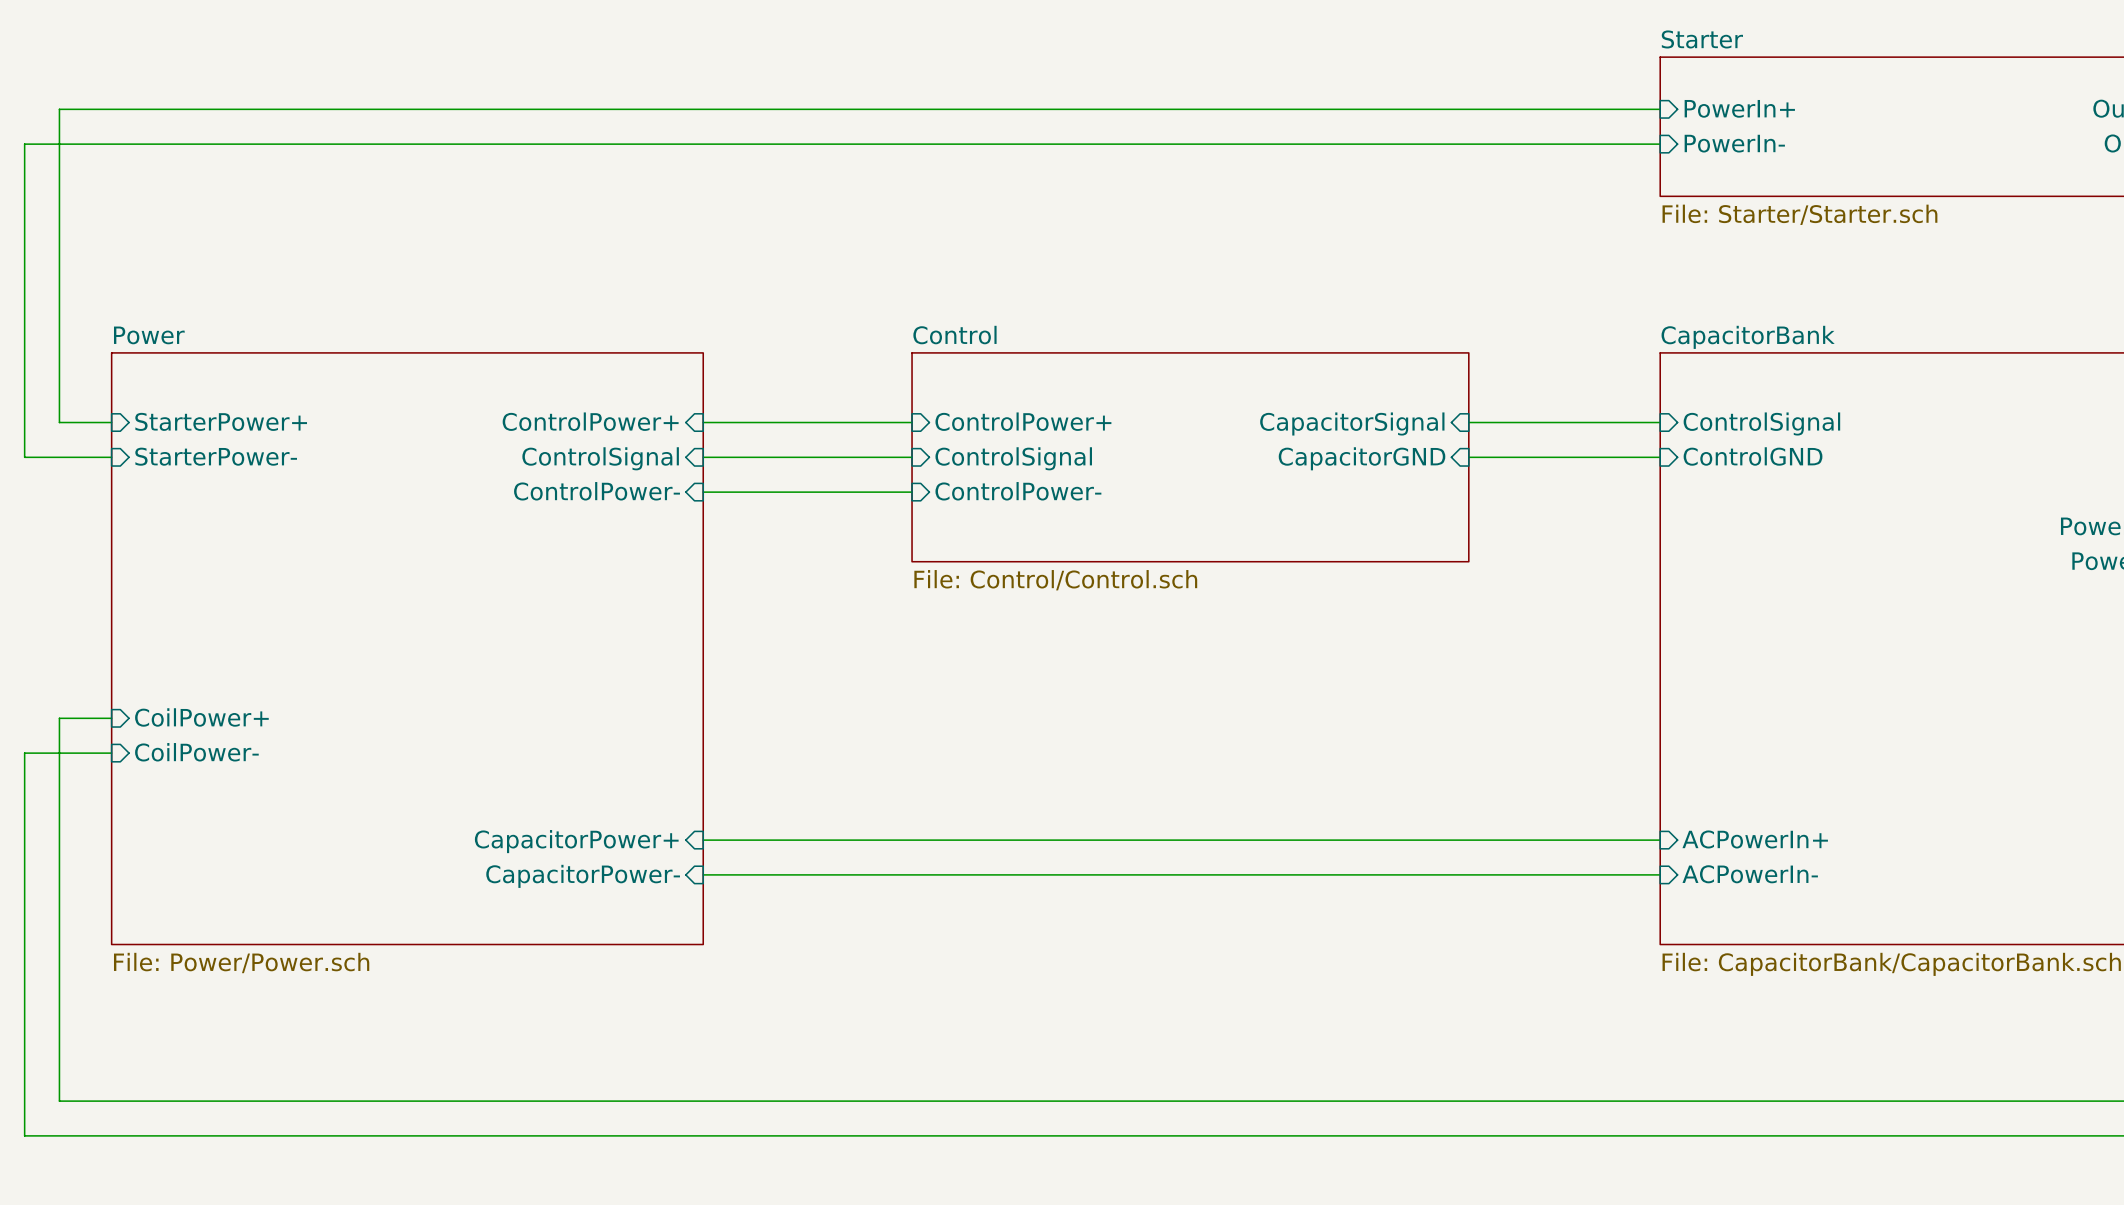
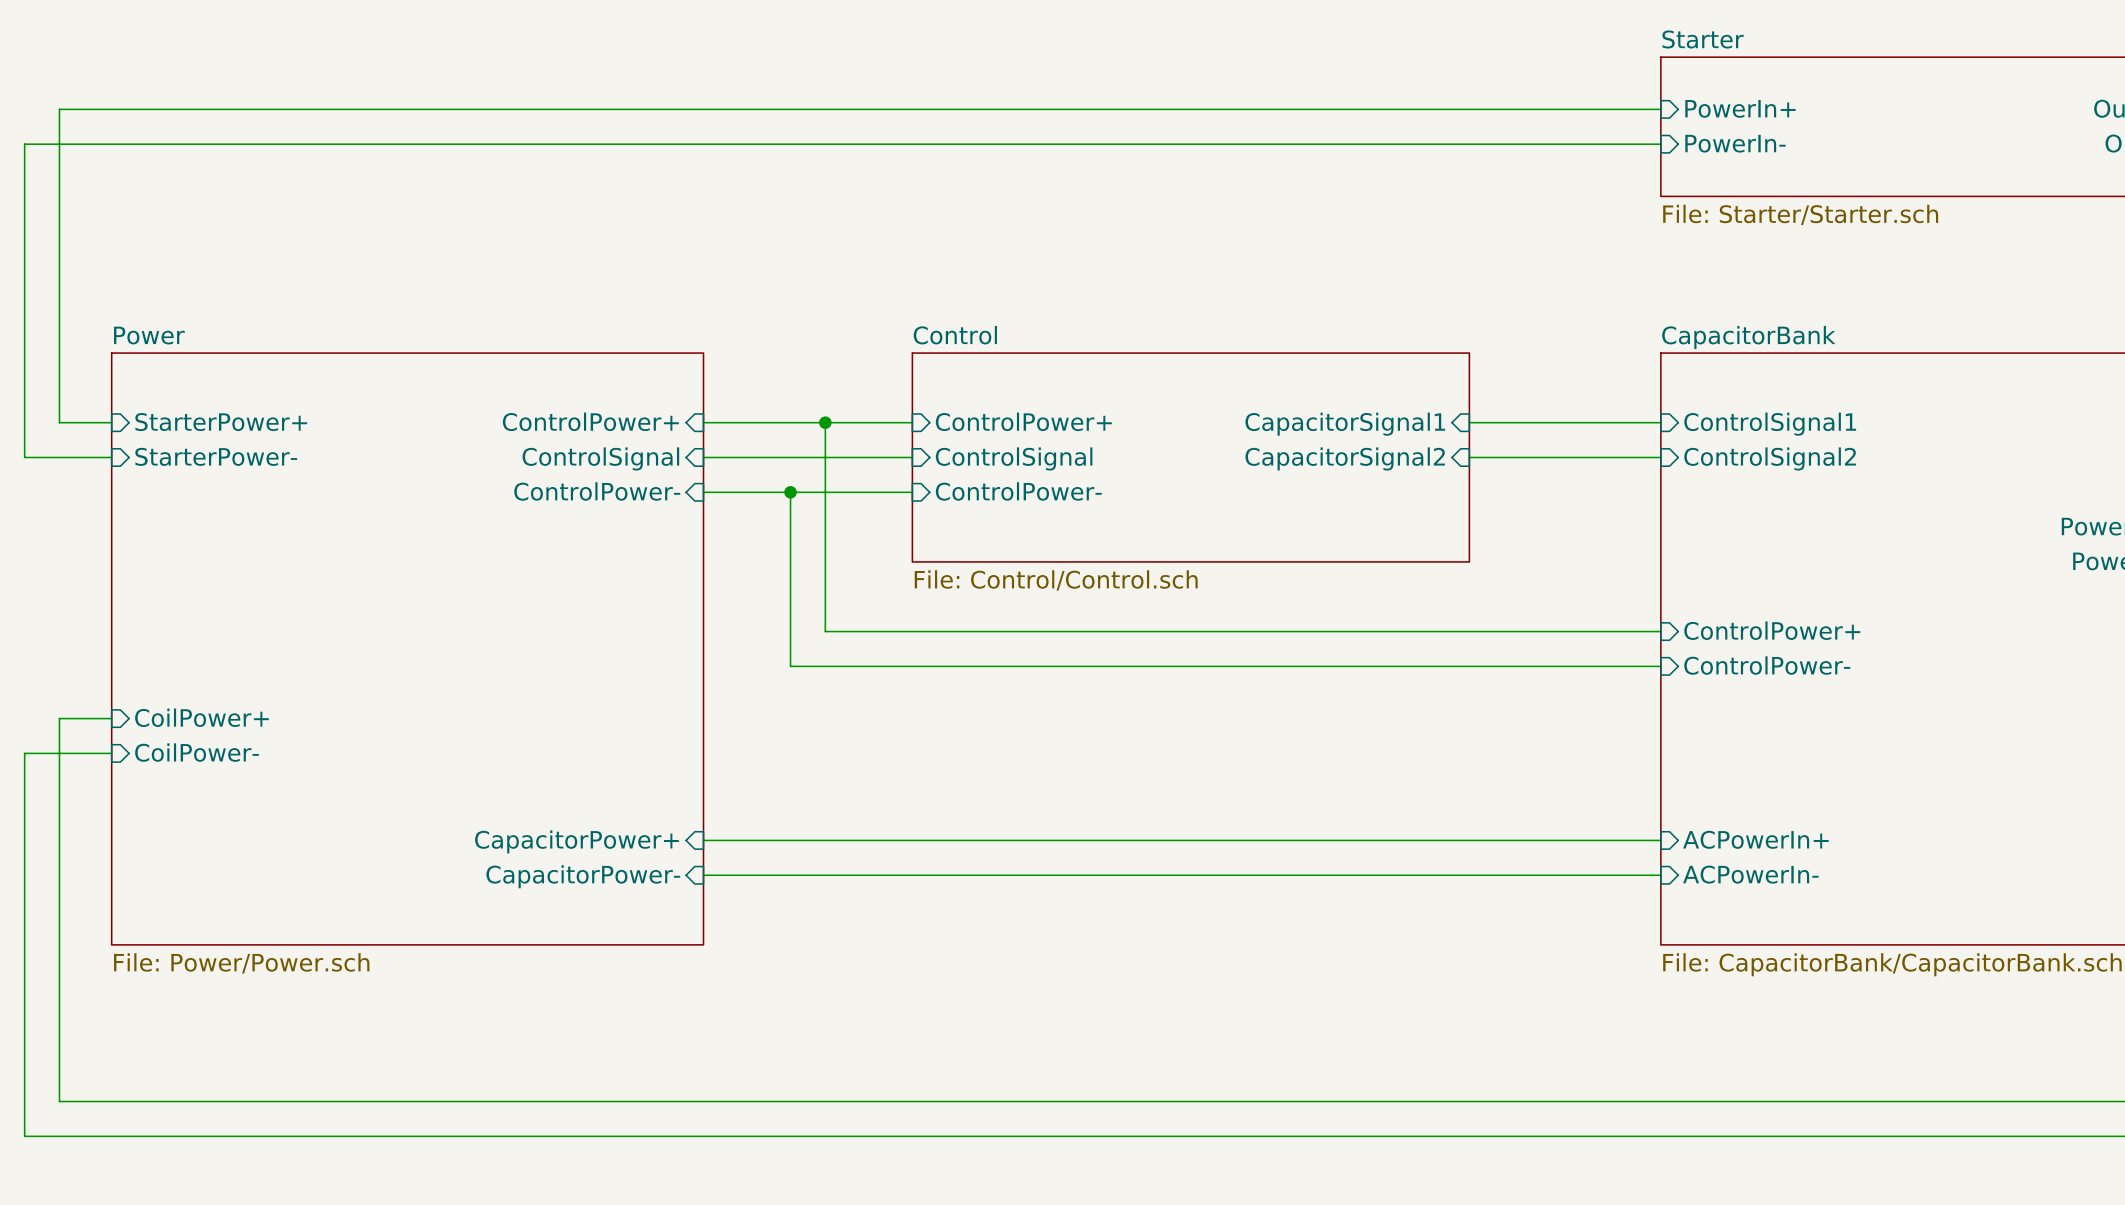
wire: none -> (825, 422) (825, 631) (1660, 631)
junction: none -> (825, 422)
sheet pin: CapacitorSignal (1352, 423) -> CapacitorSignal1 (1345, 424)
sheet pin: ControlSignal (1761, 423) -> ControlSignal1 (1770, 424)
sheet pin: ControlGND (1753, 456) -> ControlSignal2 (1770, 458)
sheet pin: CapacitorGND (1362, 458) -> CapacitorSignal2 (1345, 458)
wire: none -> (790, 492) (790, 666) (1660, 666)
junction: none -> (790, 492)
sheet pin: none -> ControlPower+ (1772, 630)
sheet pin: none -> ControlPower- (1767, 665)

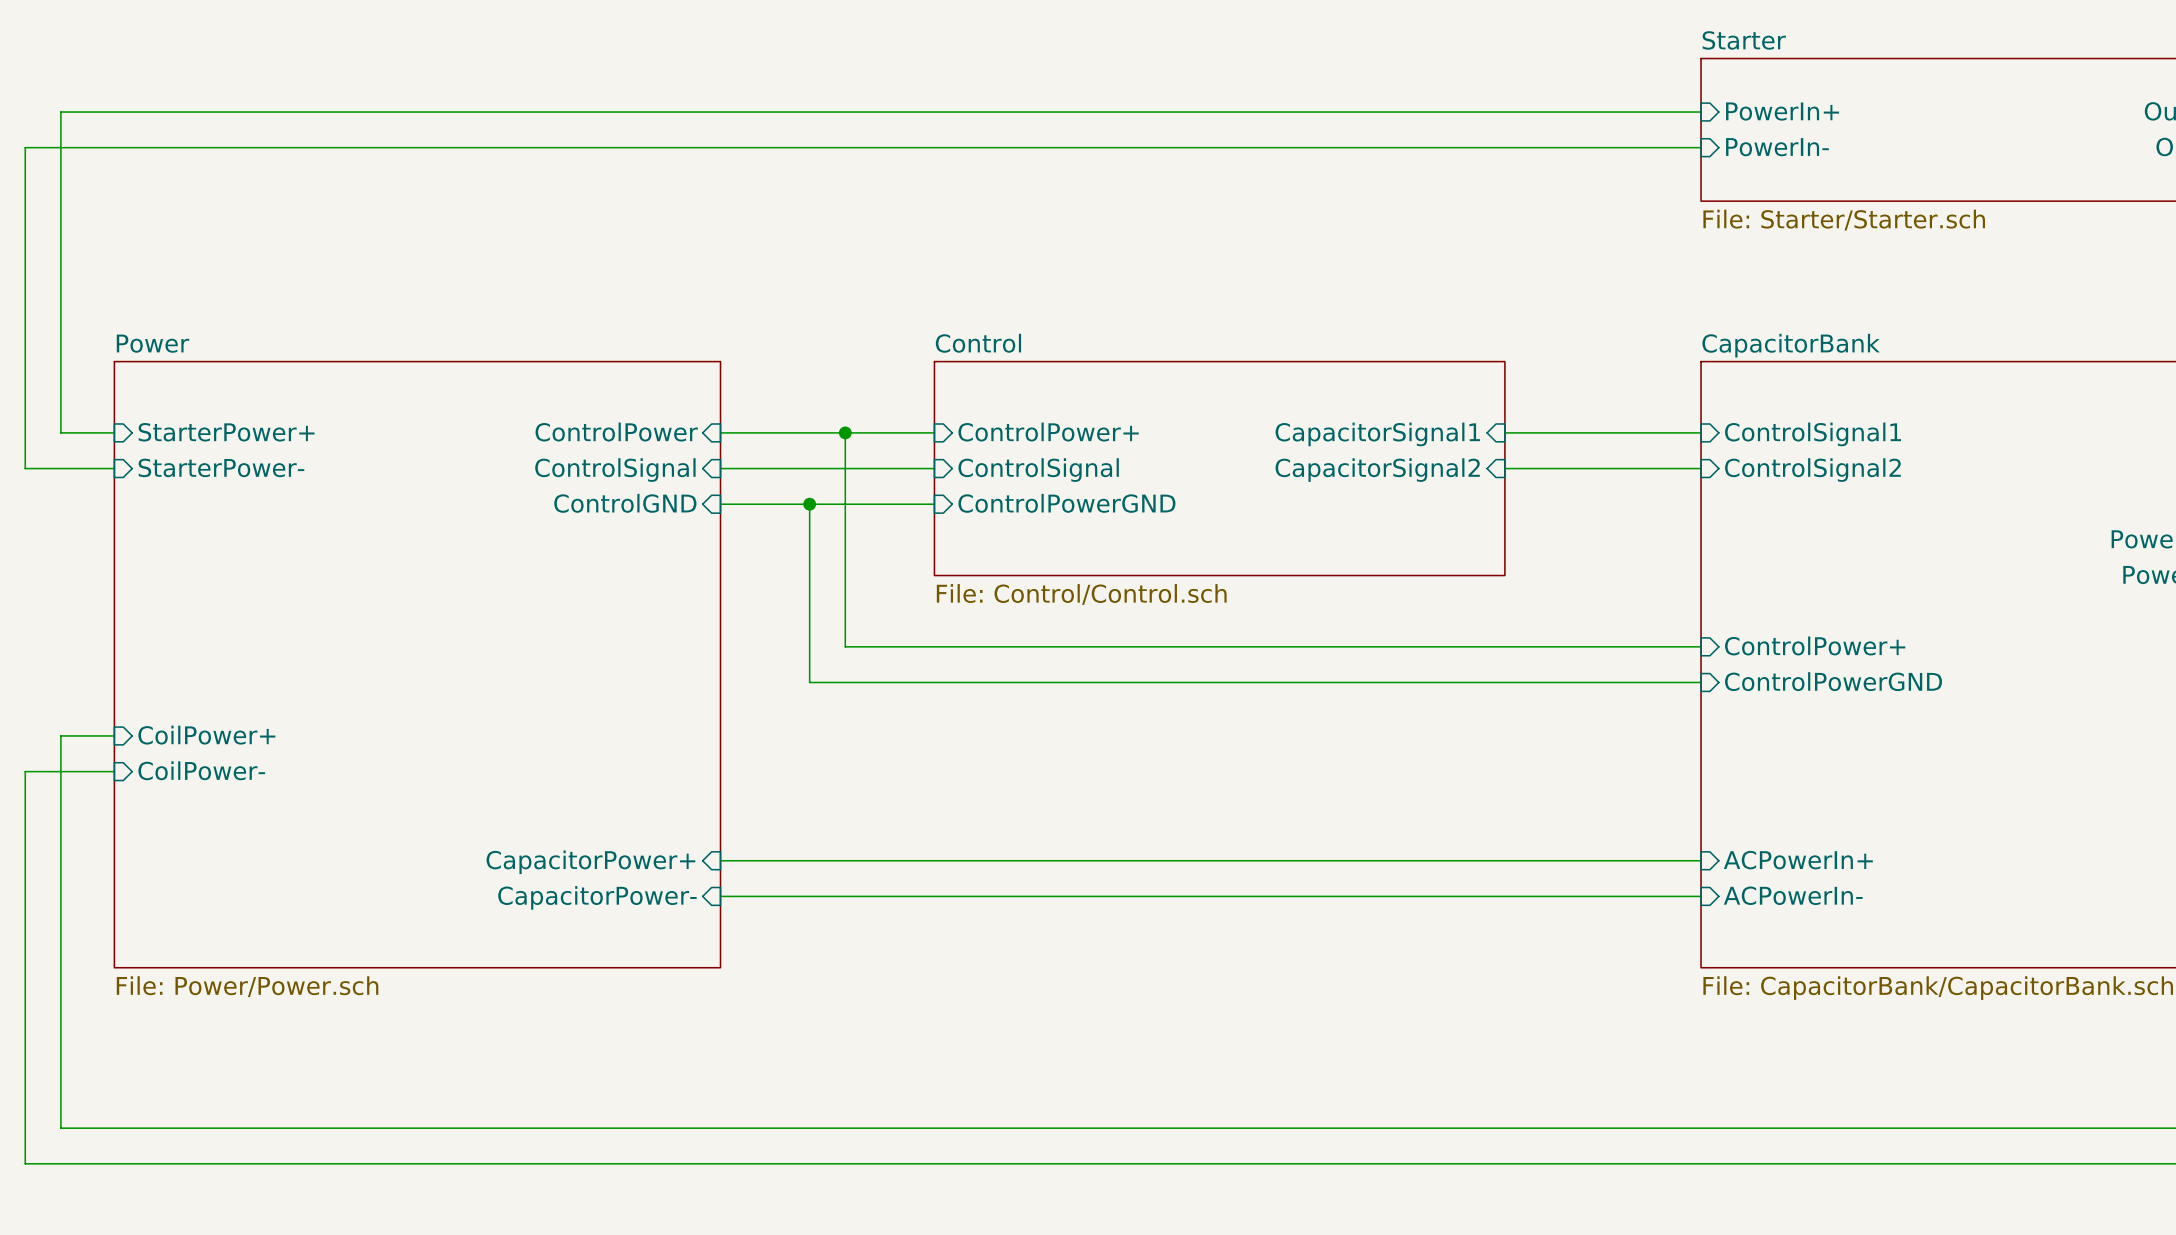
sheet pin: ControlPower+ (590, 421) -> ControlPower (616, 432)
sheet pin: ControlPower- (597, 491) -> ControlGND (625, 503)
sheet pin: ControlPower- (1018, 491) -> ControlPowerGND (1066, 503)
sheet pin: ControlPower- (1767, 665) -> ControlPowerGND (1833, 681)

